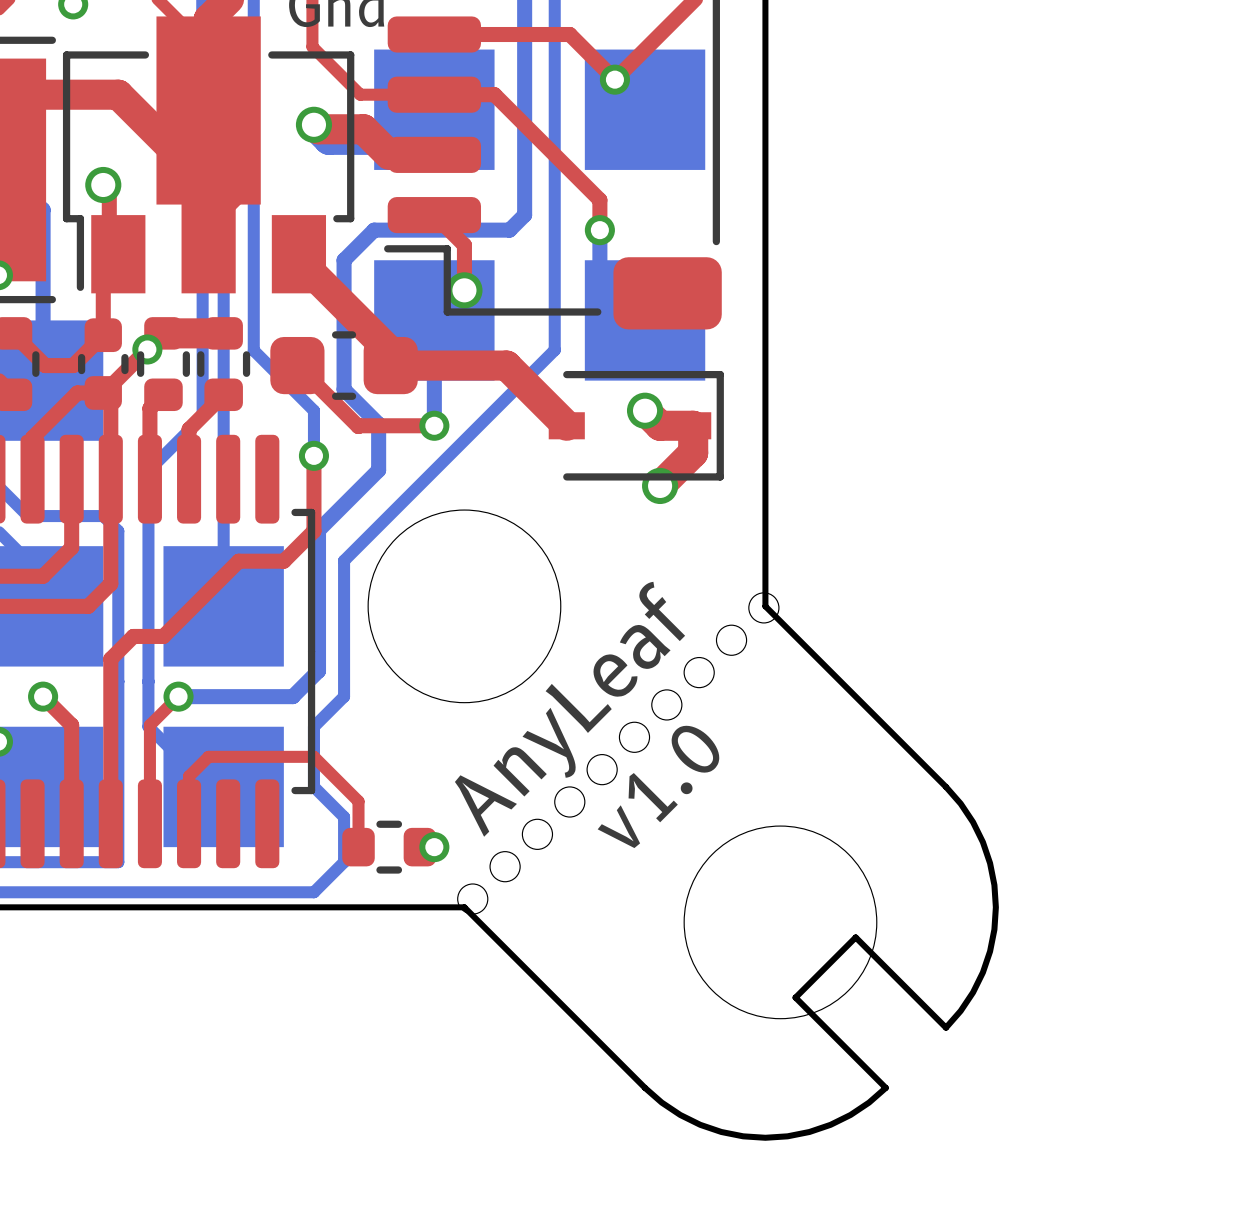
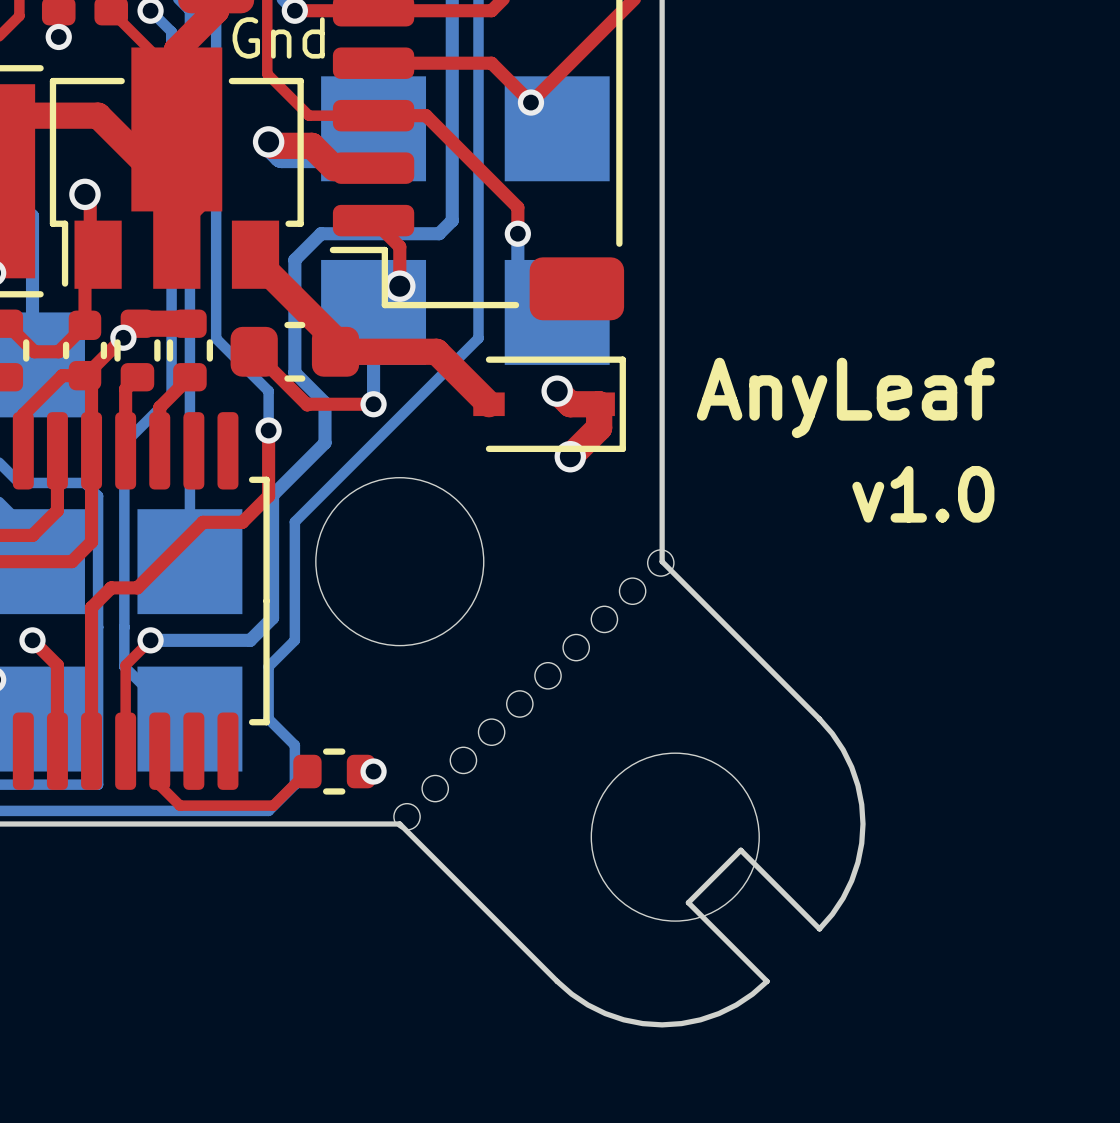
text rotation: 0° (570, 709) -> 45° clockwise (845, 397)
text position: AnyLeaf (570, 709) -> AnyLeaf (845, 397)
text rotation: 0° (658, 786) -> 45° clockwise (923, 494)
text position: v1.0 (658, 786) -> v1.0 (923, 494)
top track: (189, 823) (189, 776) (208, 756) (313, 756) (358, 801) (358, 847) -> (159, 751) (159, 785) (179, 805) (273, 805) (307, 771)

